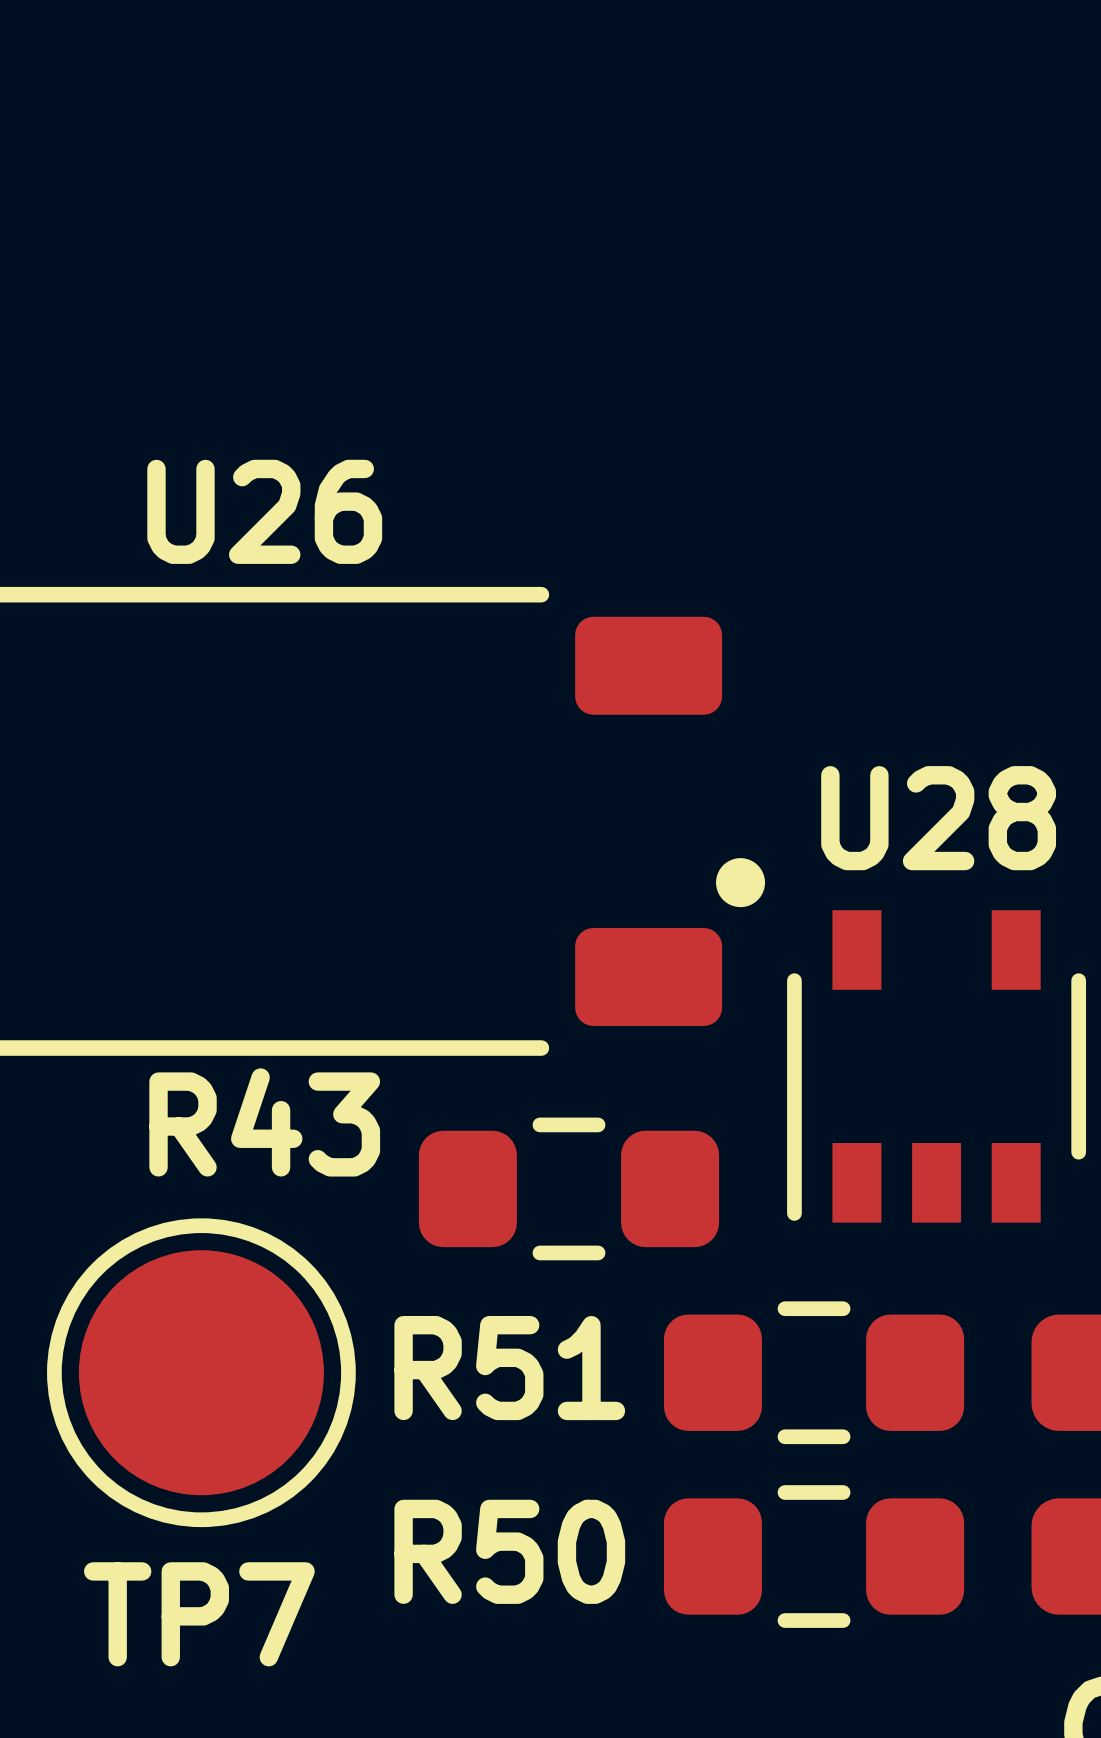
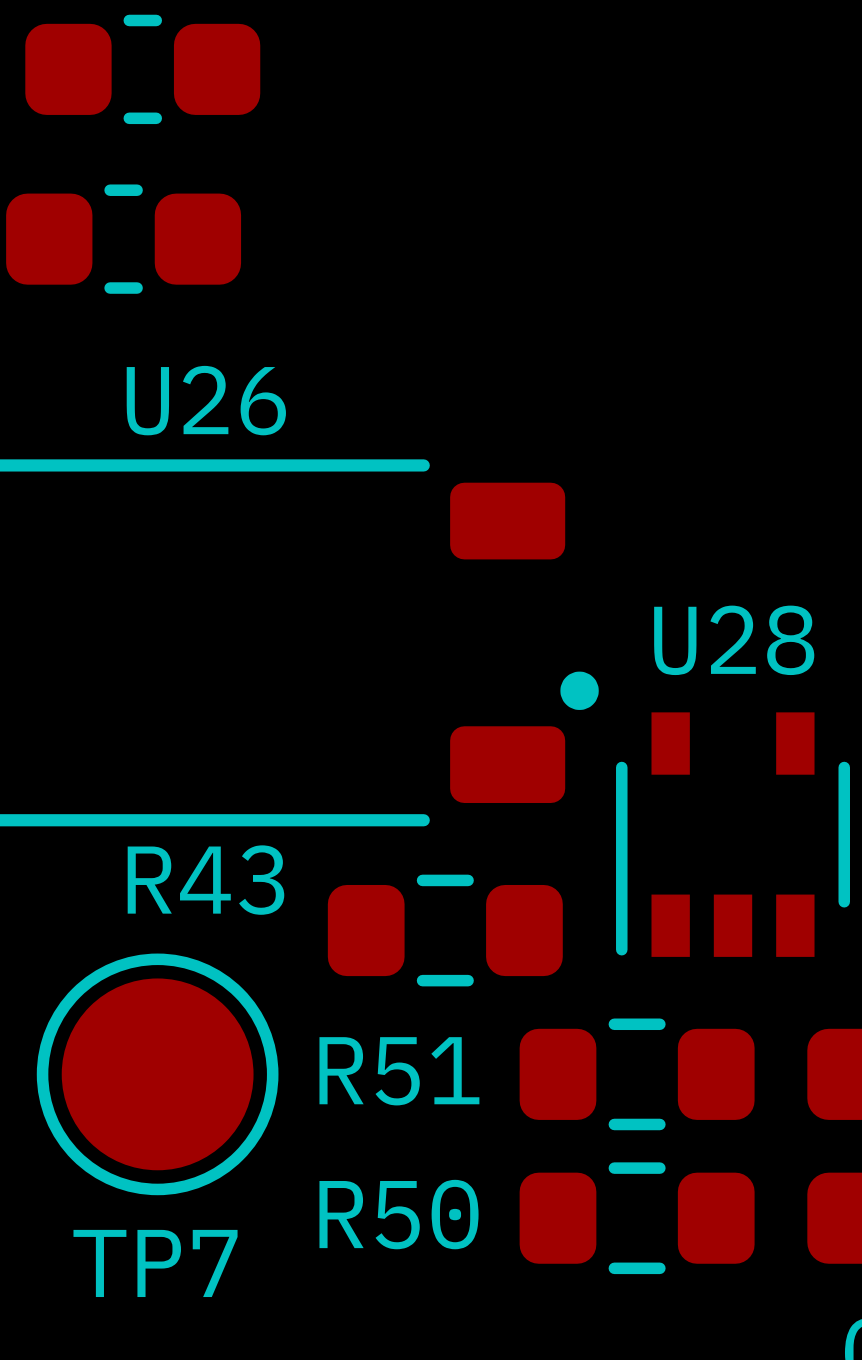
part: none -> (142, 69)
part: none -> (123, 239)

